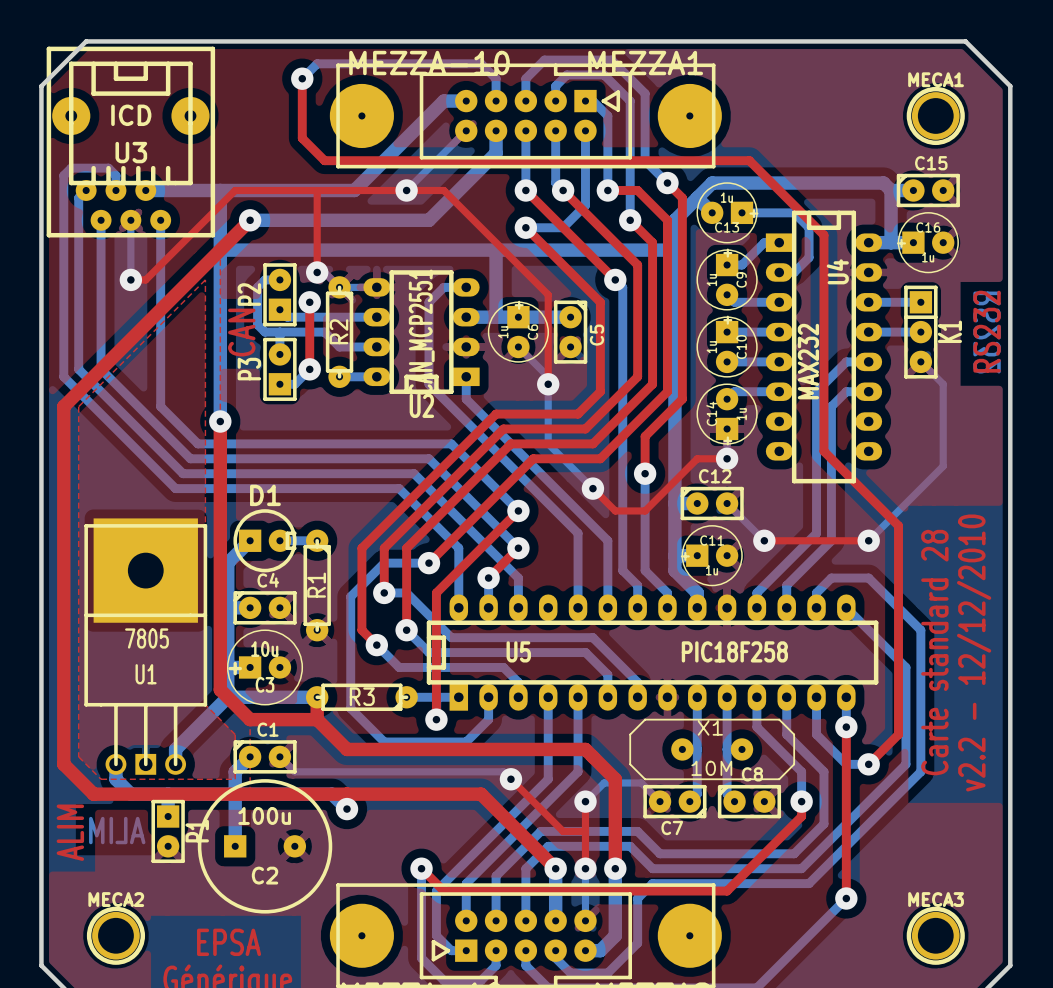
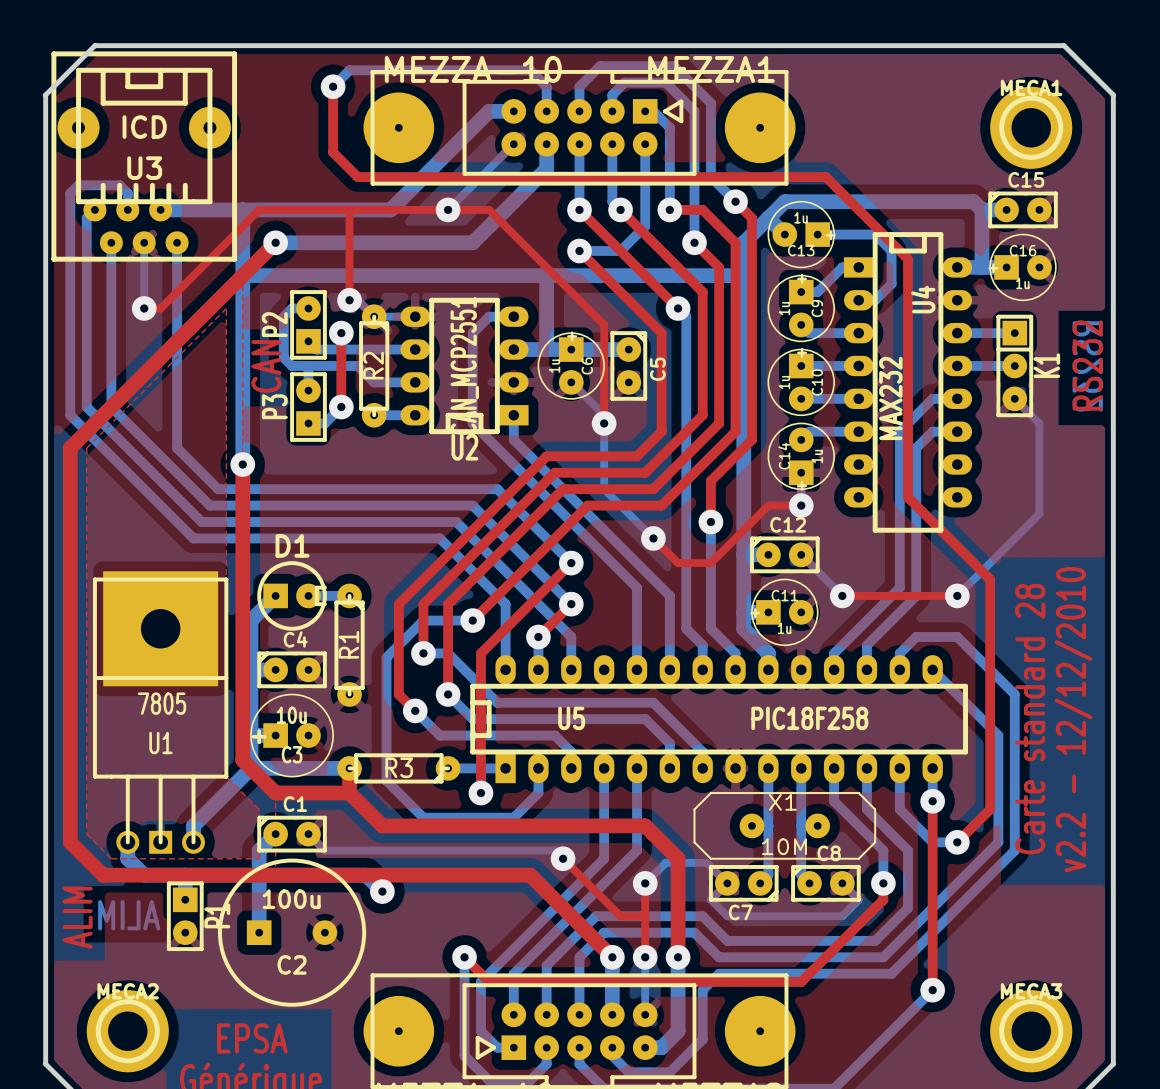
MECA1 footprint: [906, 86, 965, 146] -> [990, 86, 1073, 169]
bottom track: none -> (727, 883) (710, 899) (727, 916) (842, 916) (858, 899) (842, 883)
MECA2 footprint: [86, 906, 146, 965] -> [86, 990, 169, 1073]
MECA3 footprint: [906, 906, 965, 965] -> [990, 990, 1073, 1073]

